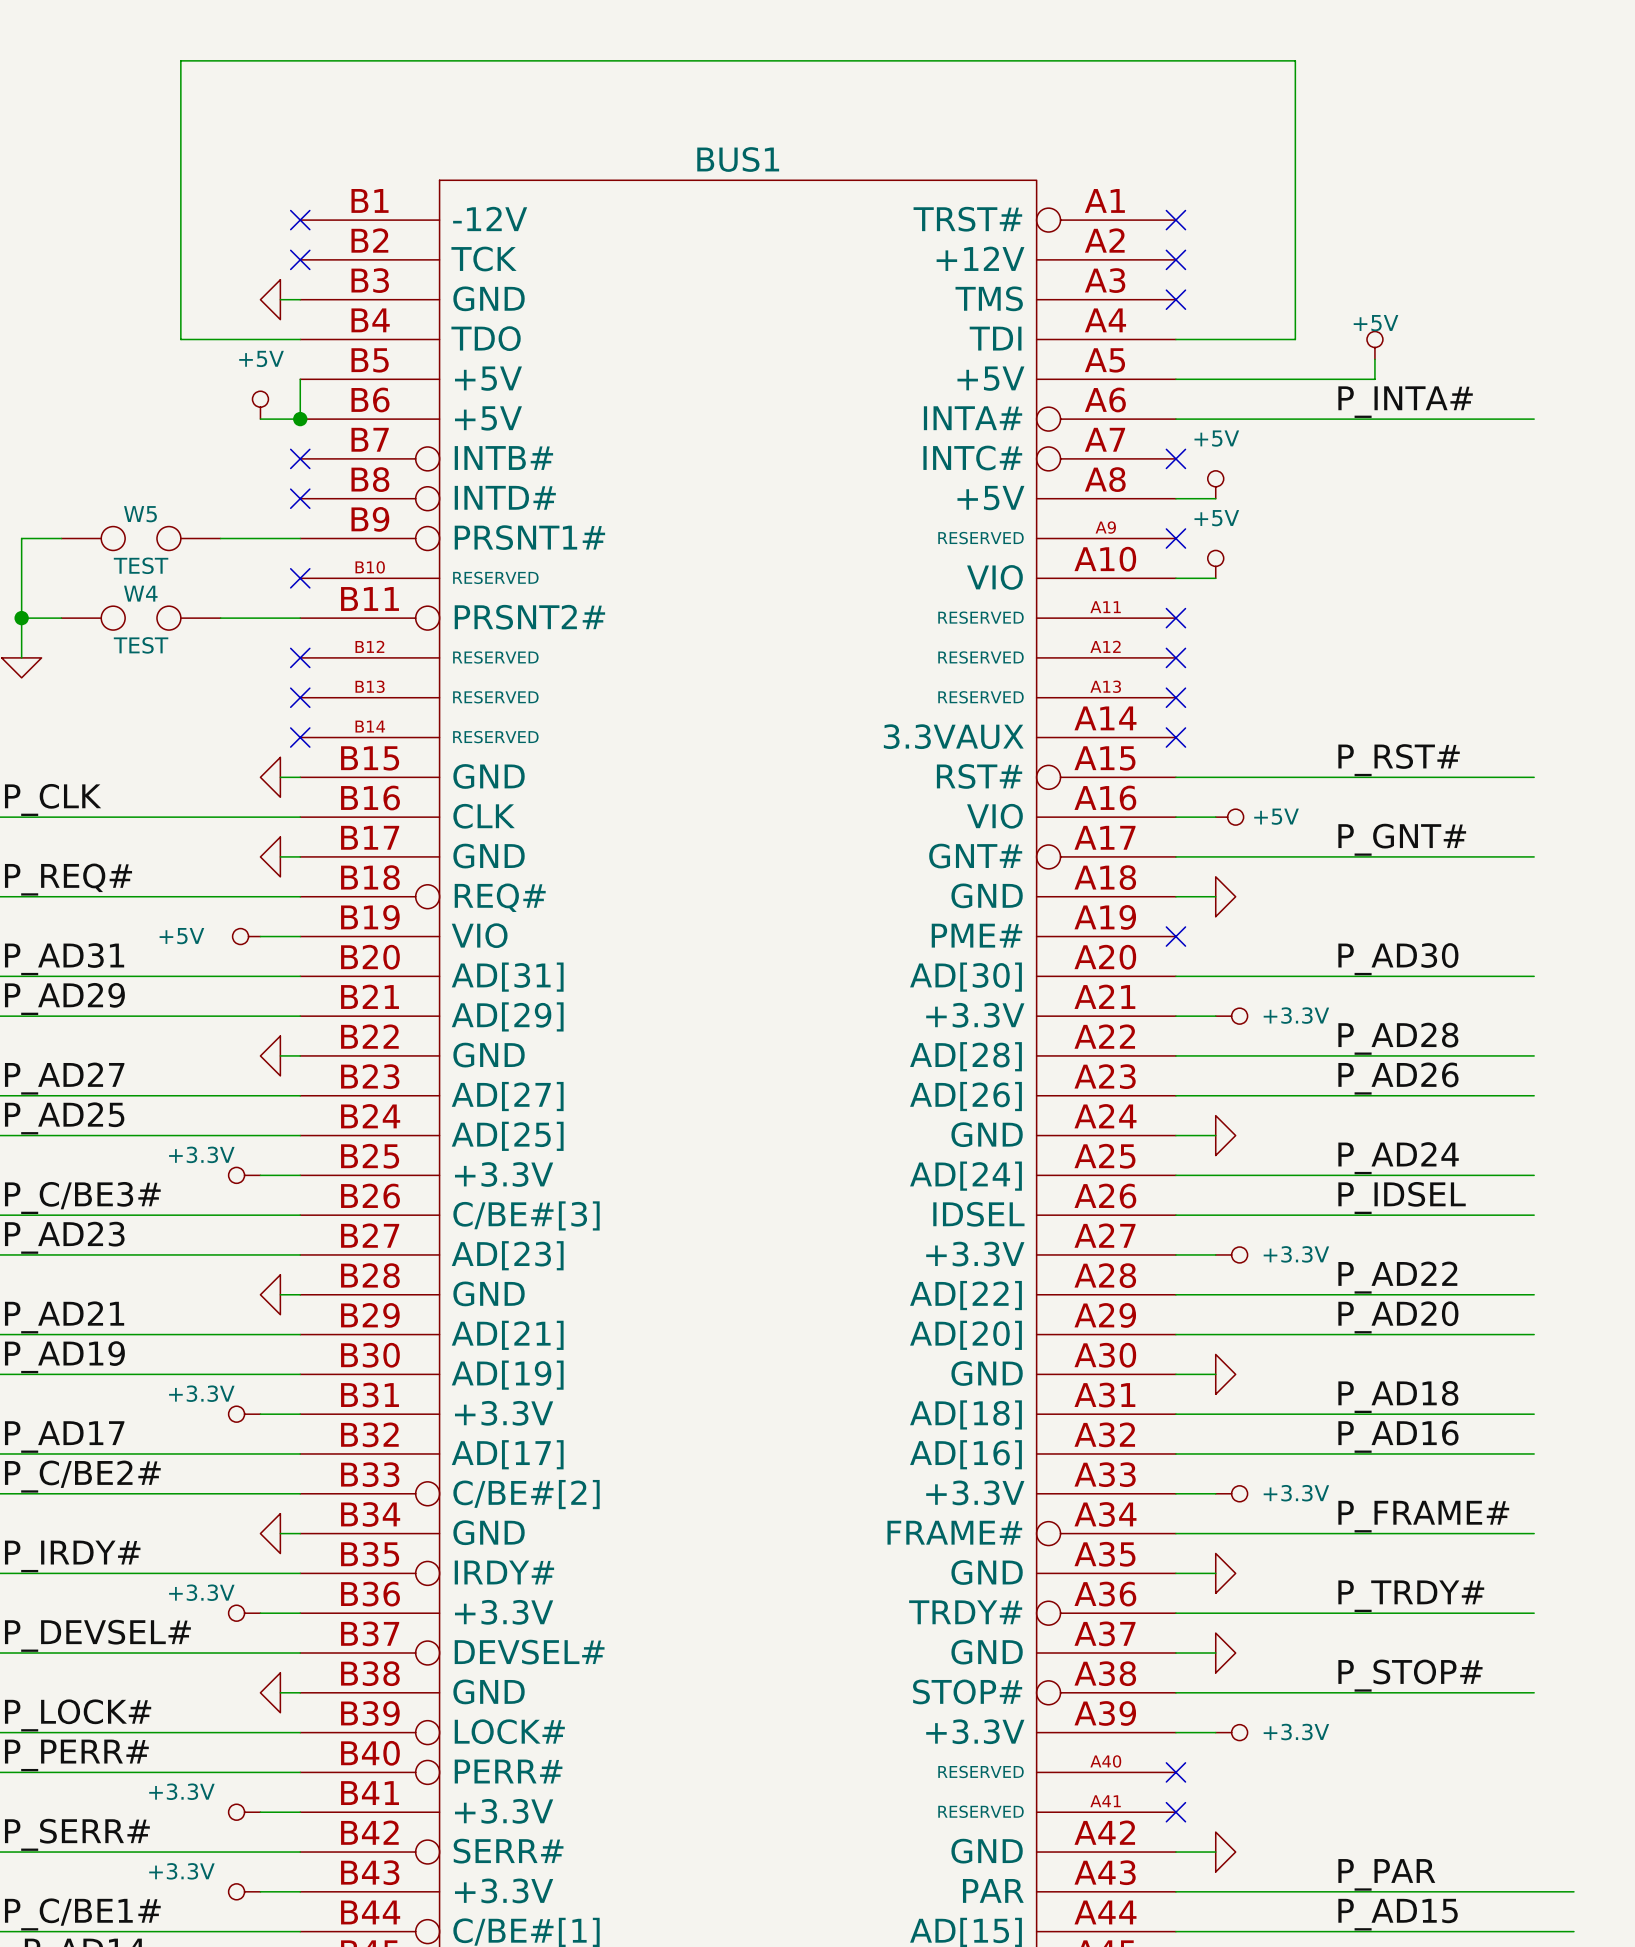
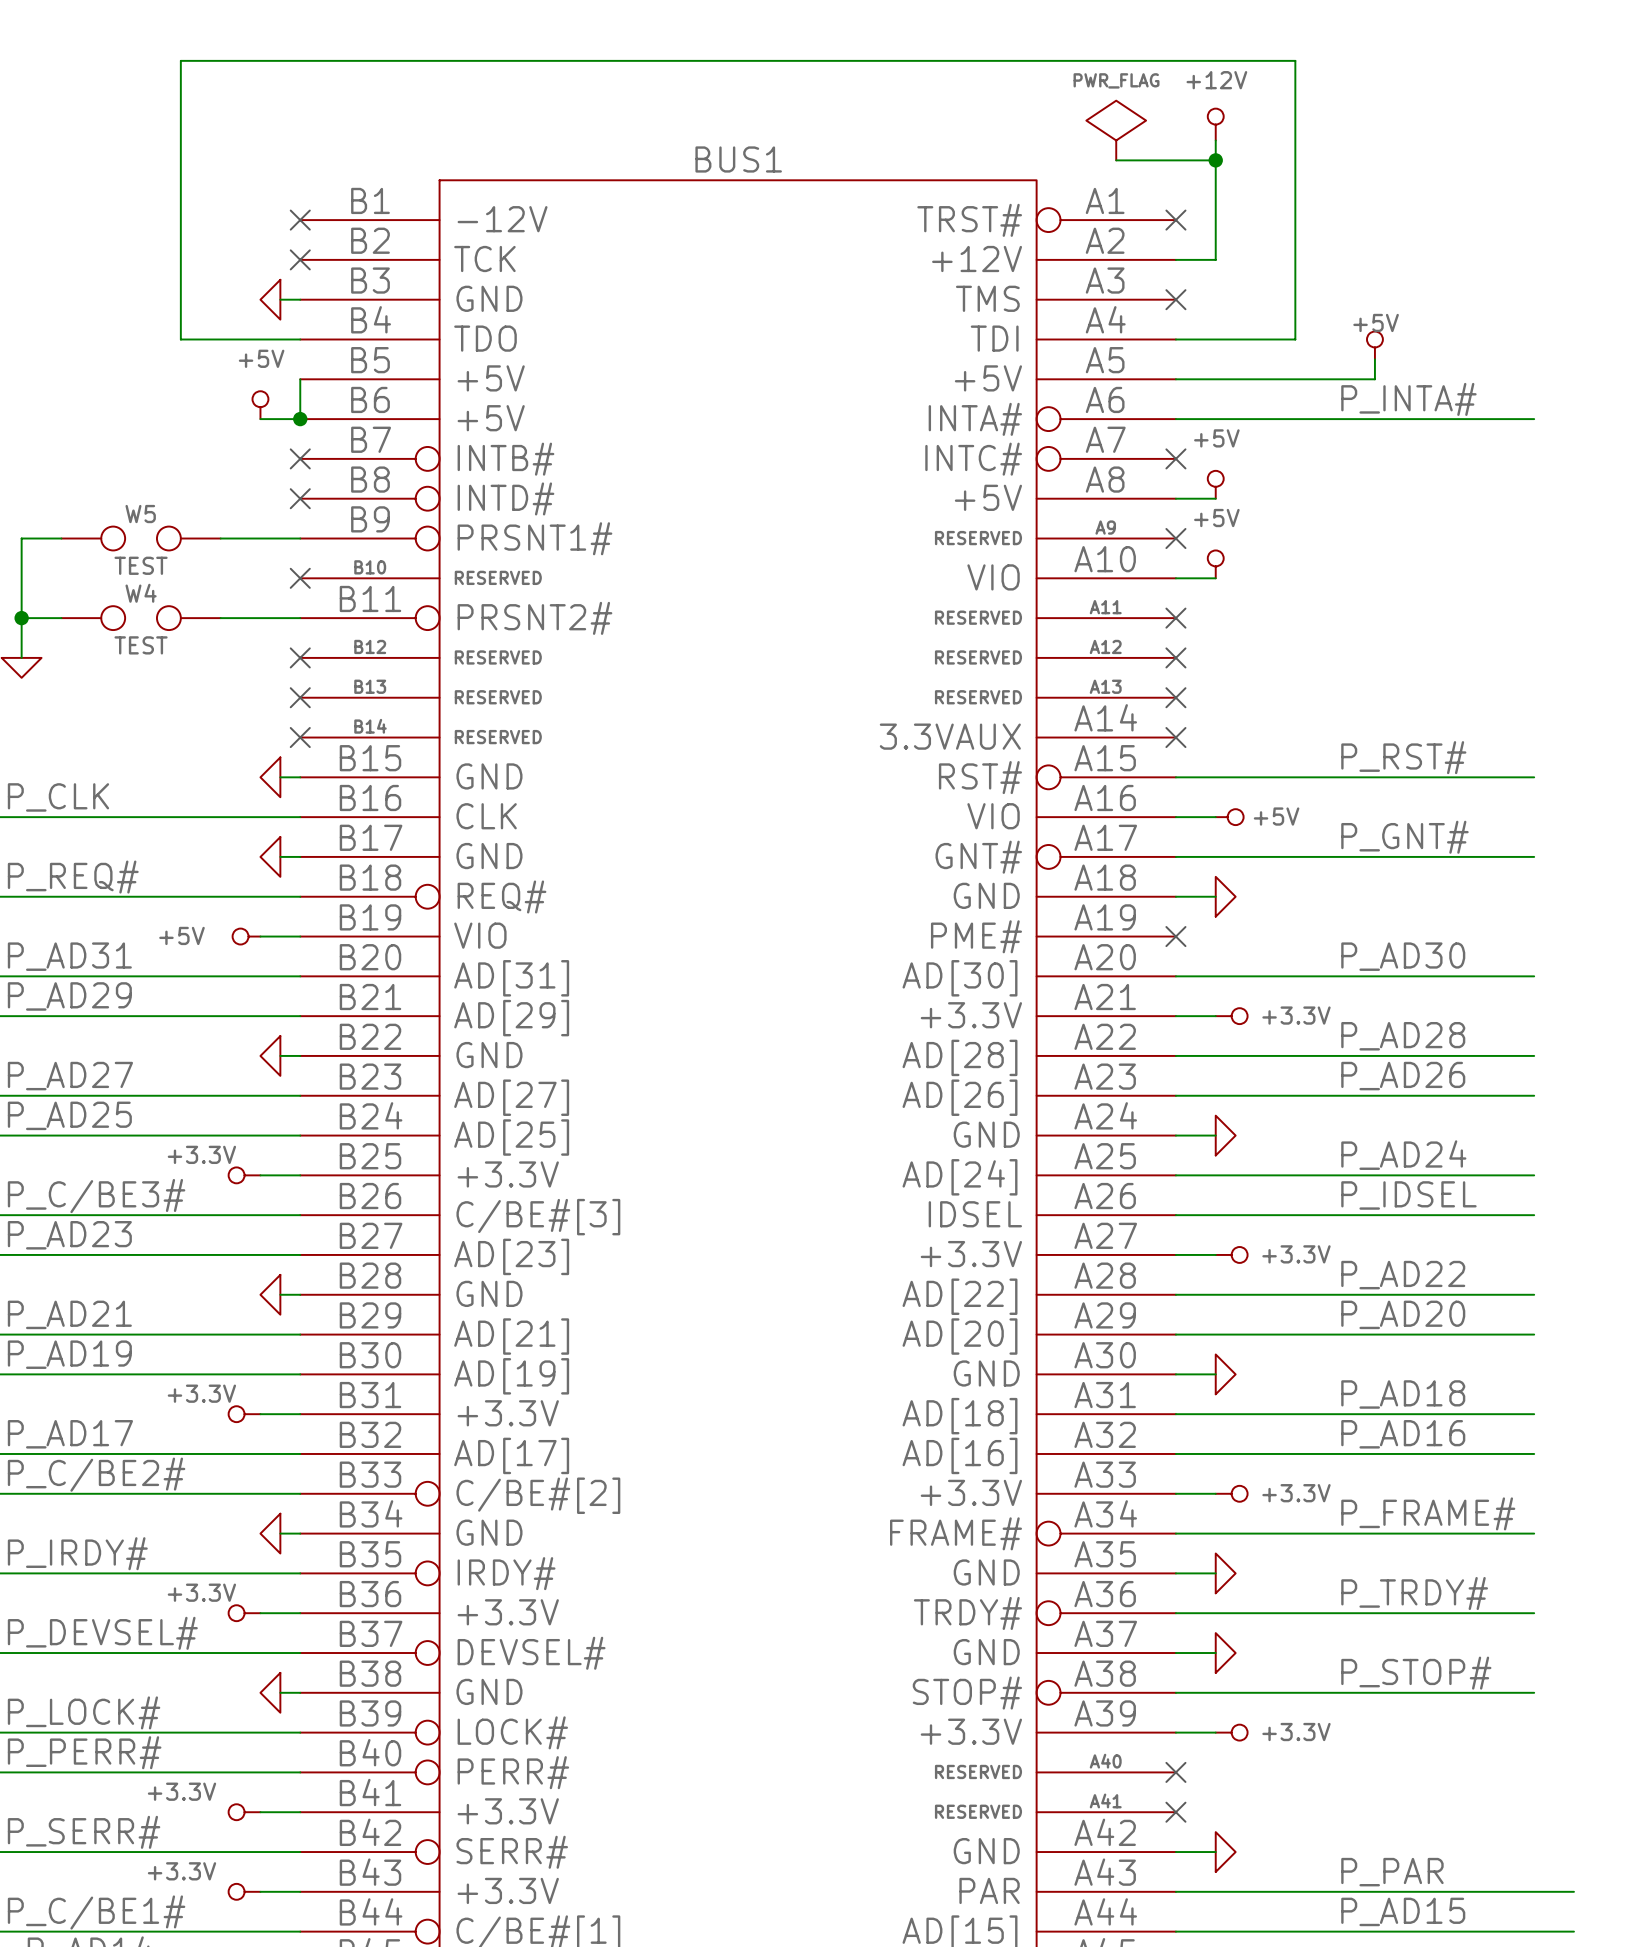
power symbol: none -> +12V (1215, 124)
power symbol: none -> PWR_FLAG (1116, 130)
wire: none -> (1215, 140) (1215, 259) (1175, 259)
wire: none -> (1116, 160) (1215, 160)
junction: none -> (1215, 160)
no-connect mark: (1175, 259) -> none

